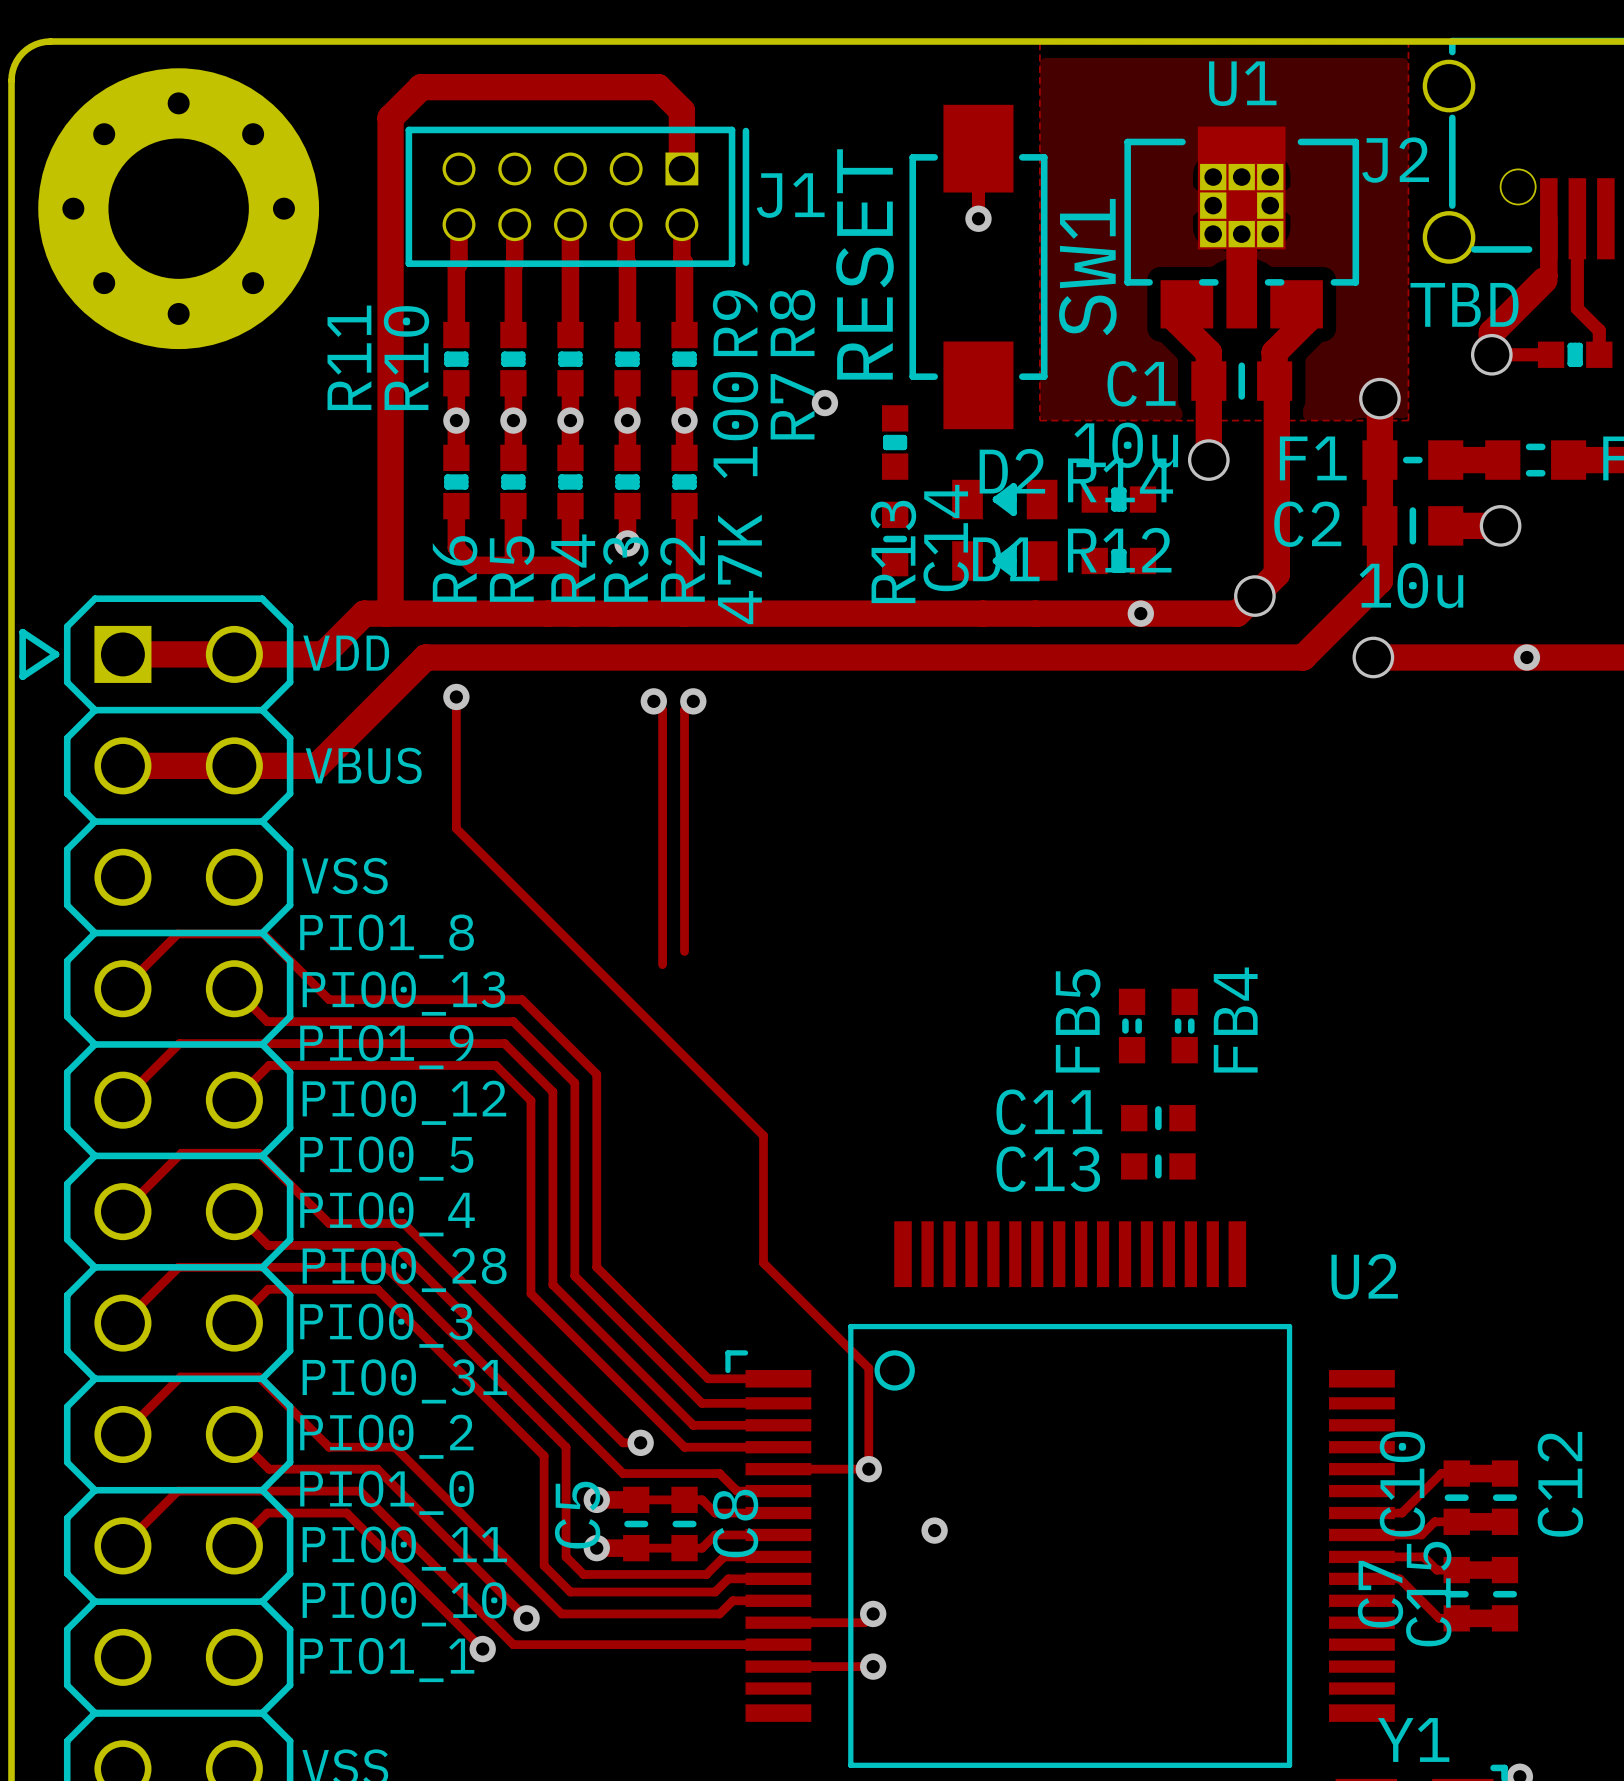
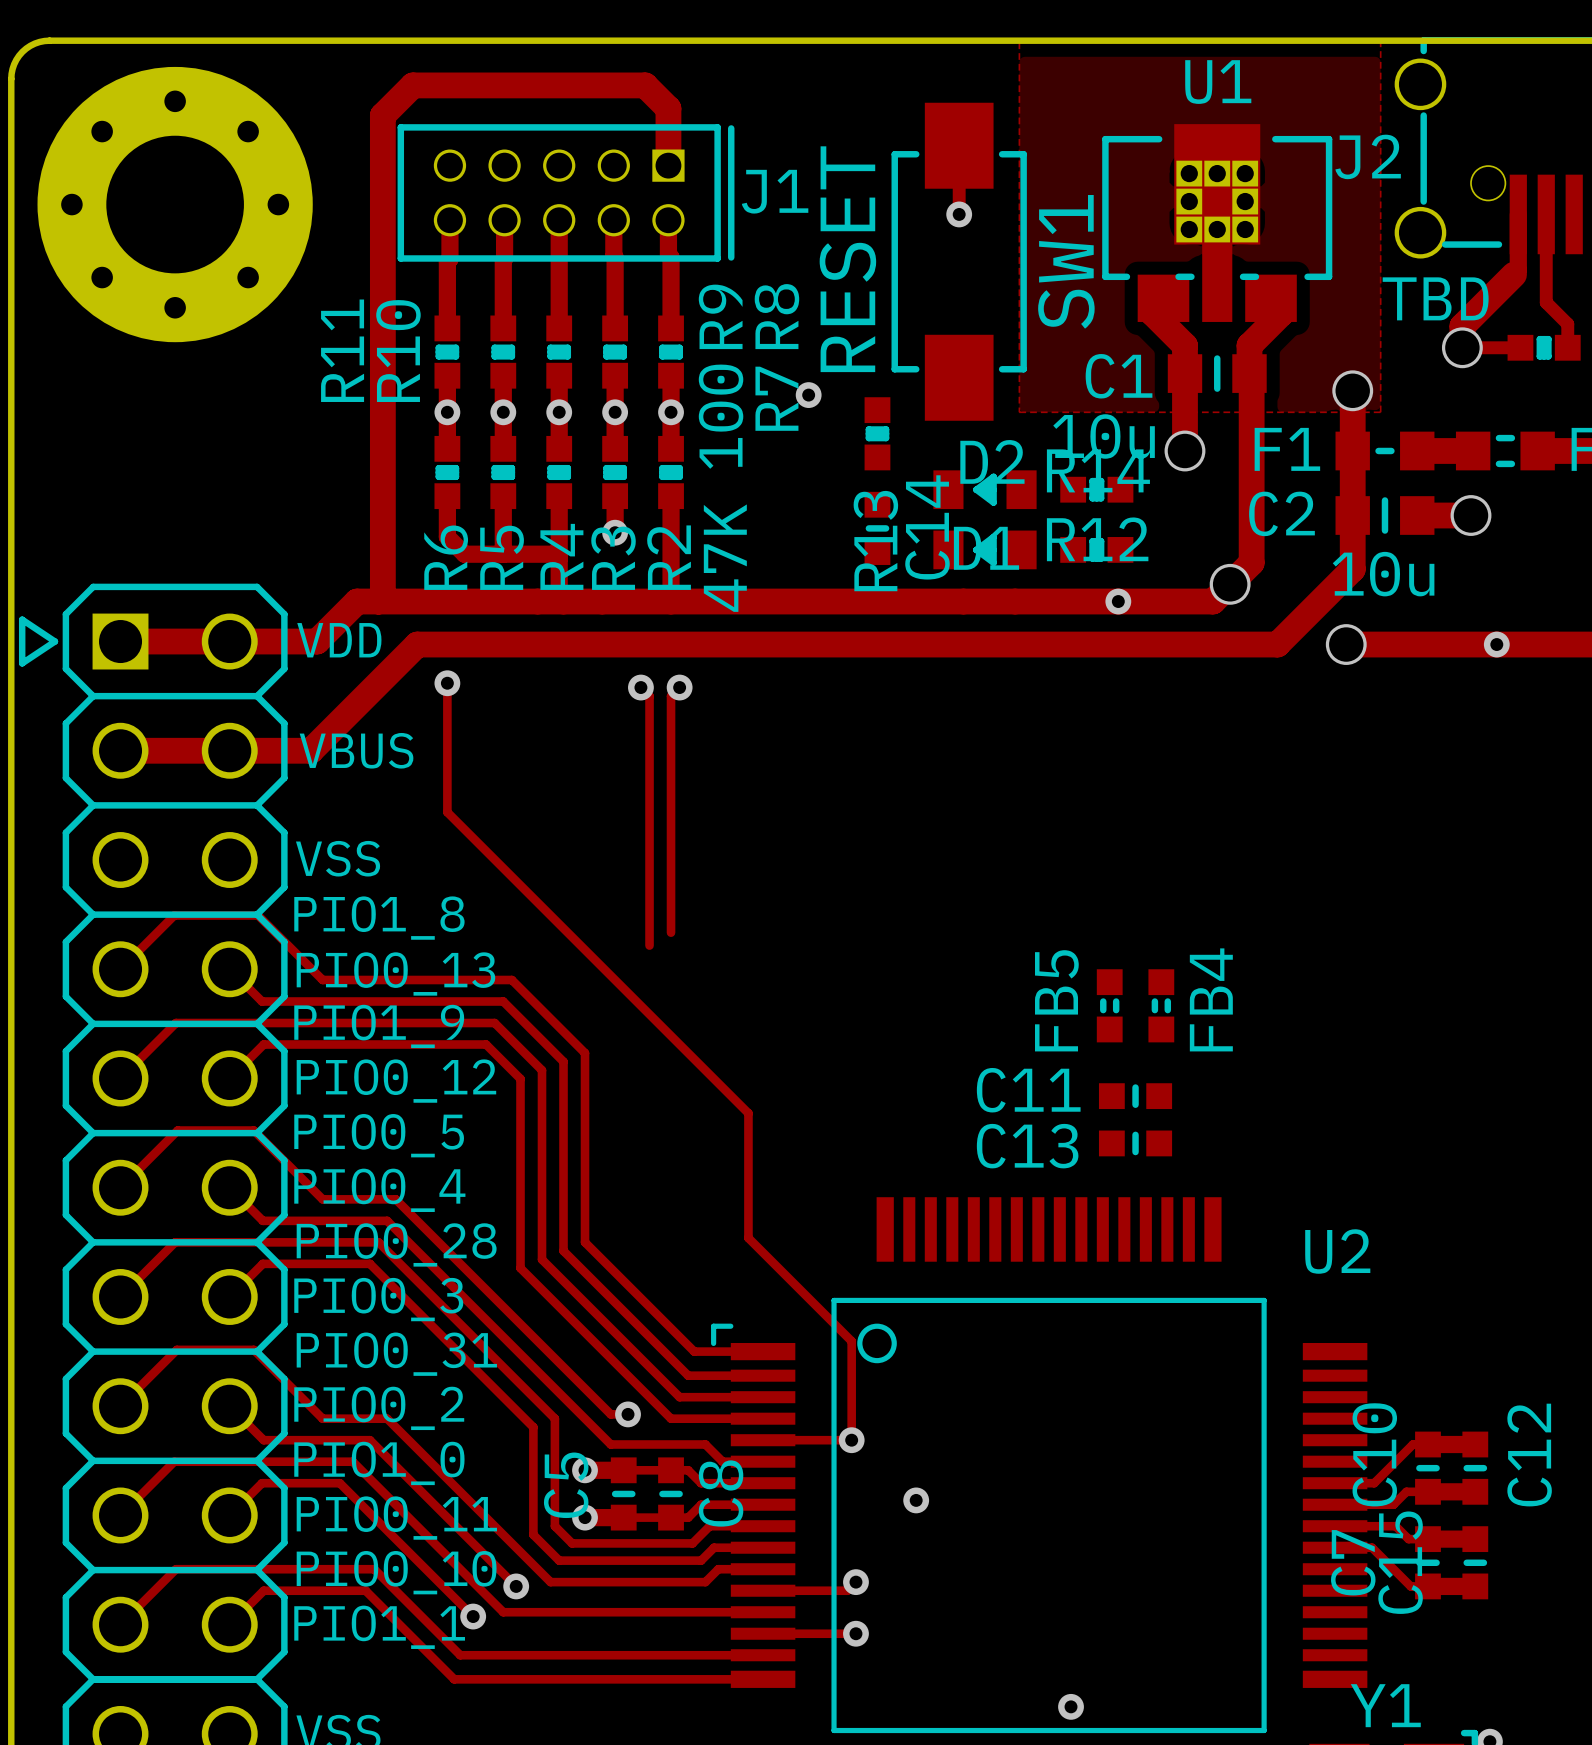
track: none -> (120, 1624) (176, 1569) (374, 1569) (460, 1655) (763, 1655)
track: none -> (229, 1624) (263, 1590) (365, 1590) (454, 1679) (763, 1679)
via: none -> (1071, 1706)

